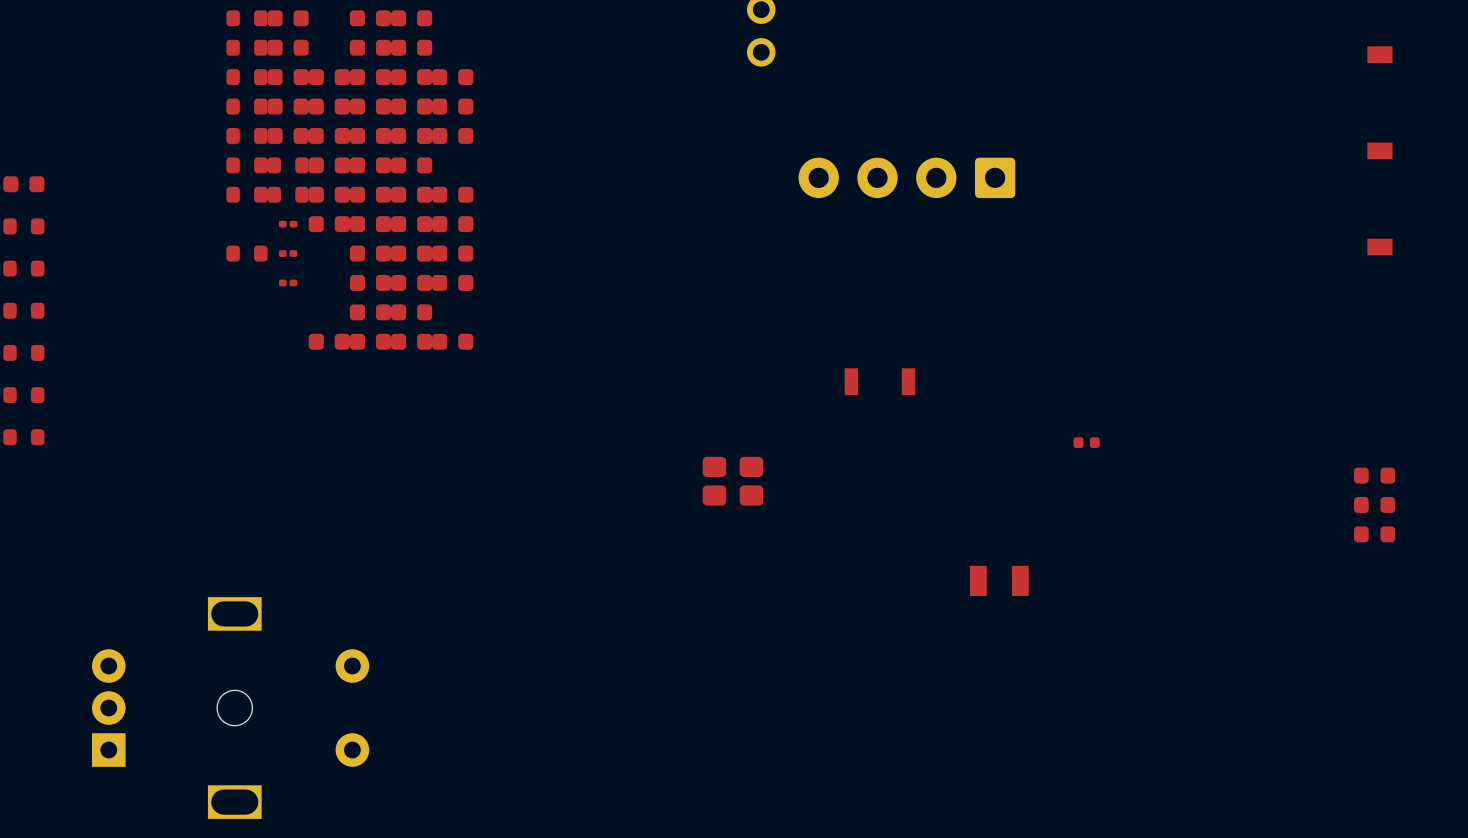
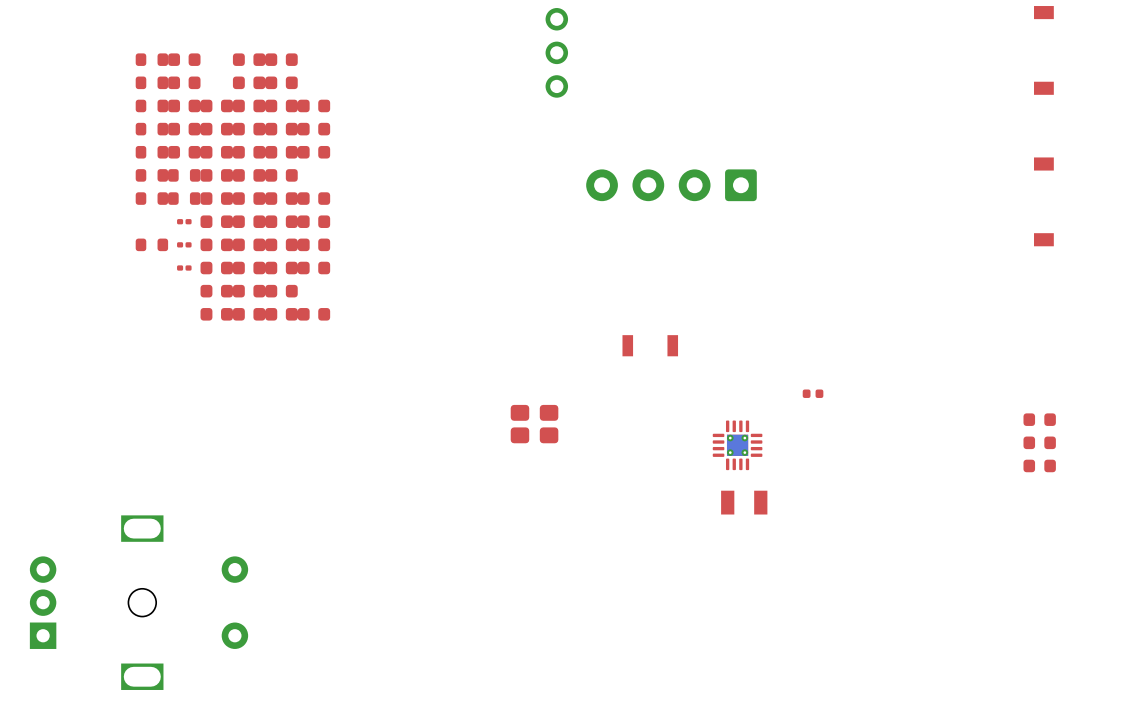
part: none -> (216, 244)
part: none -> (216, 268)
part: none -> (216, 291)
part: none -> (737, 445)

